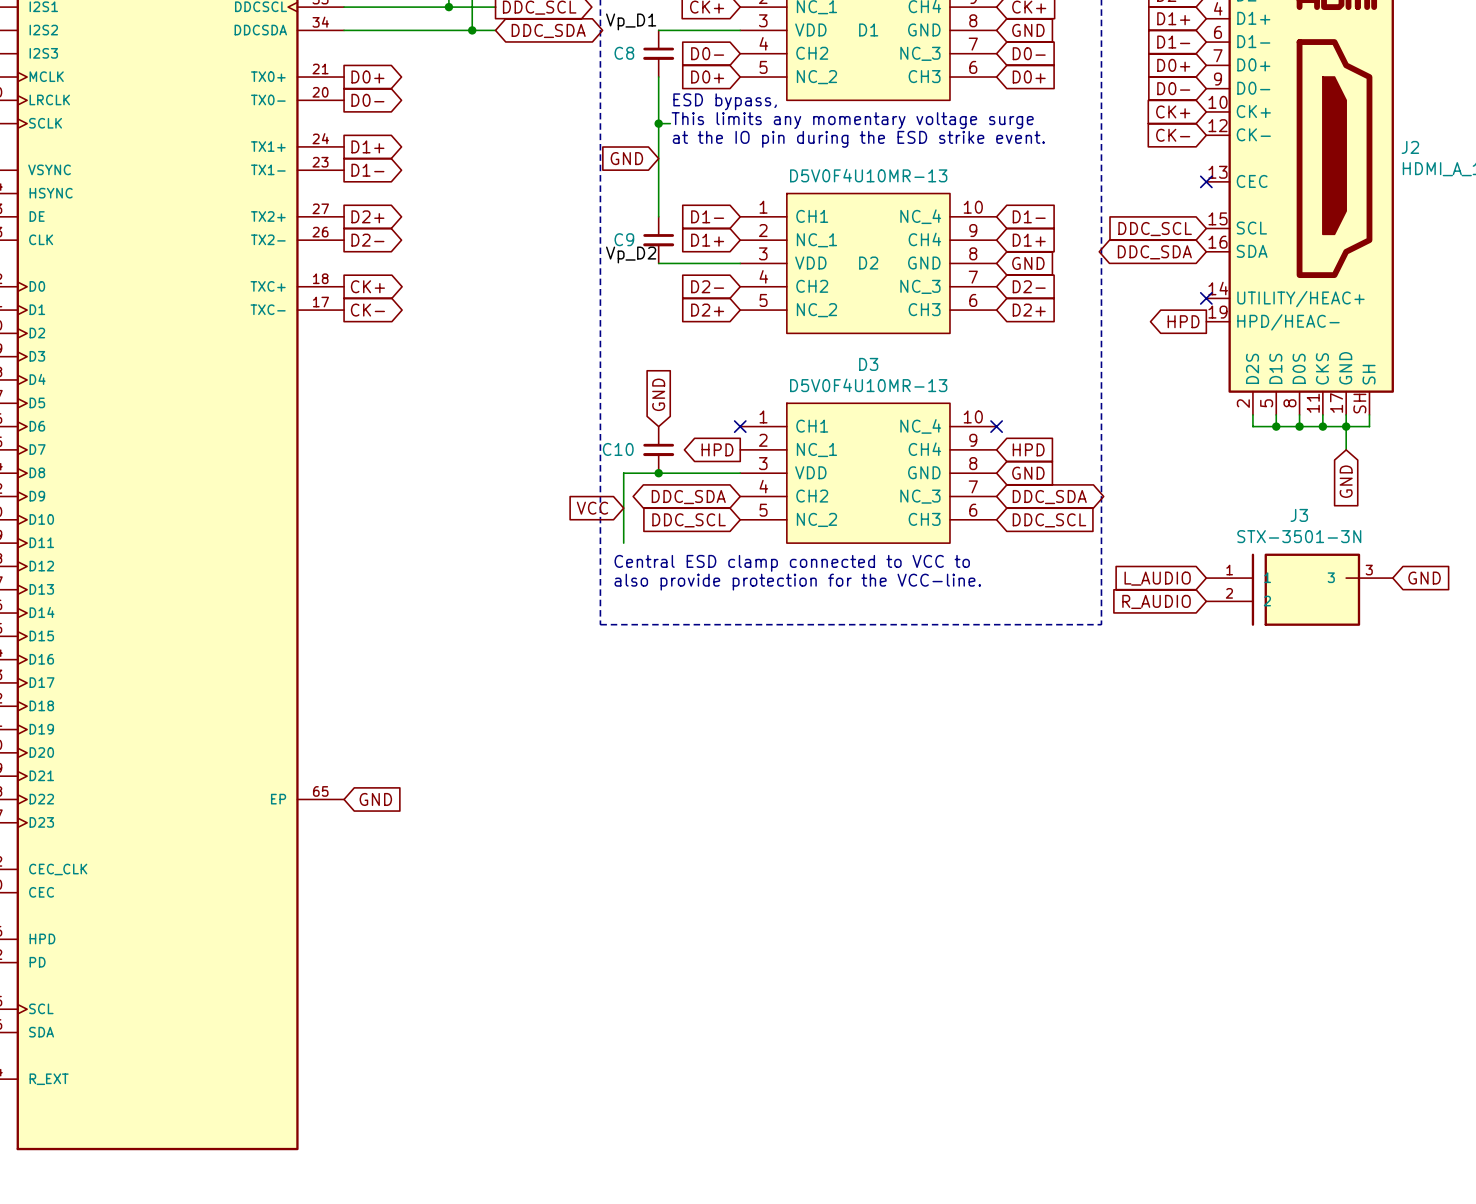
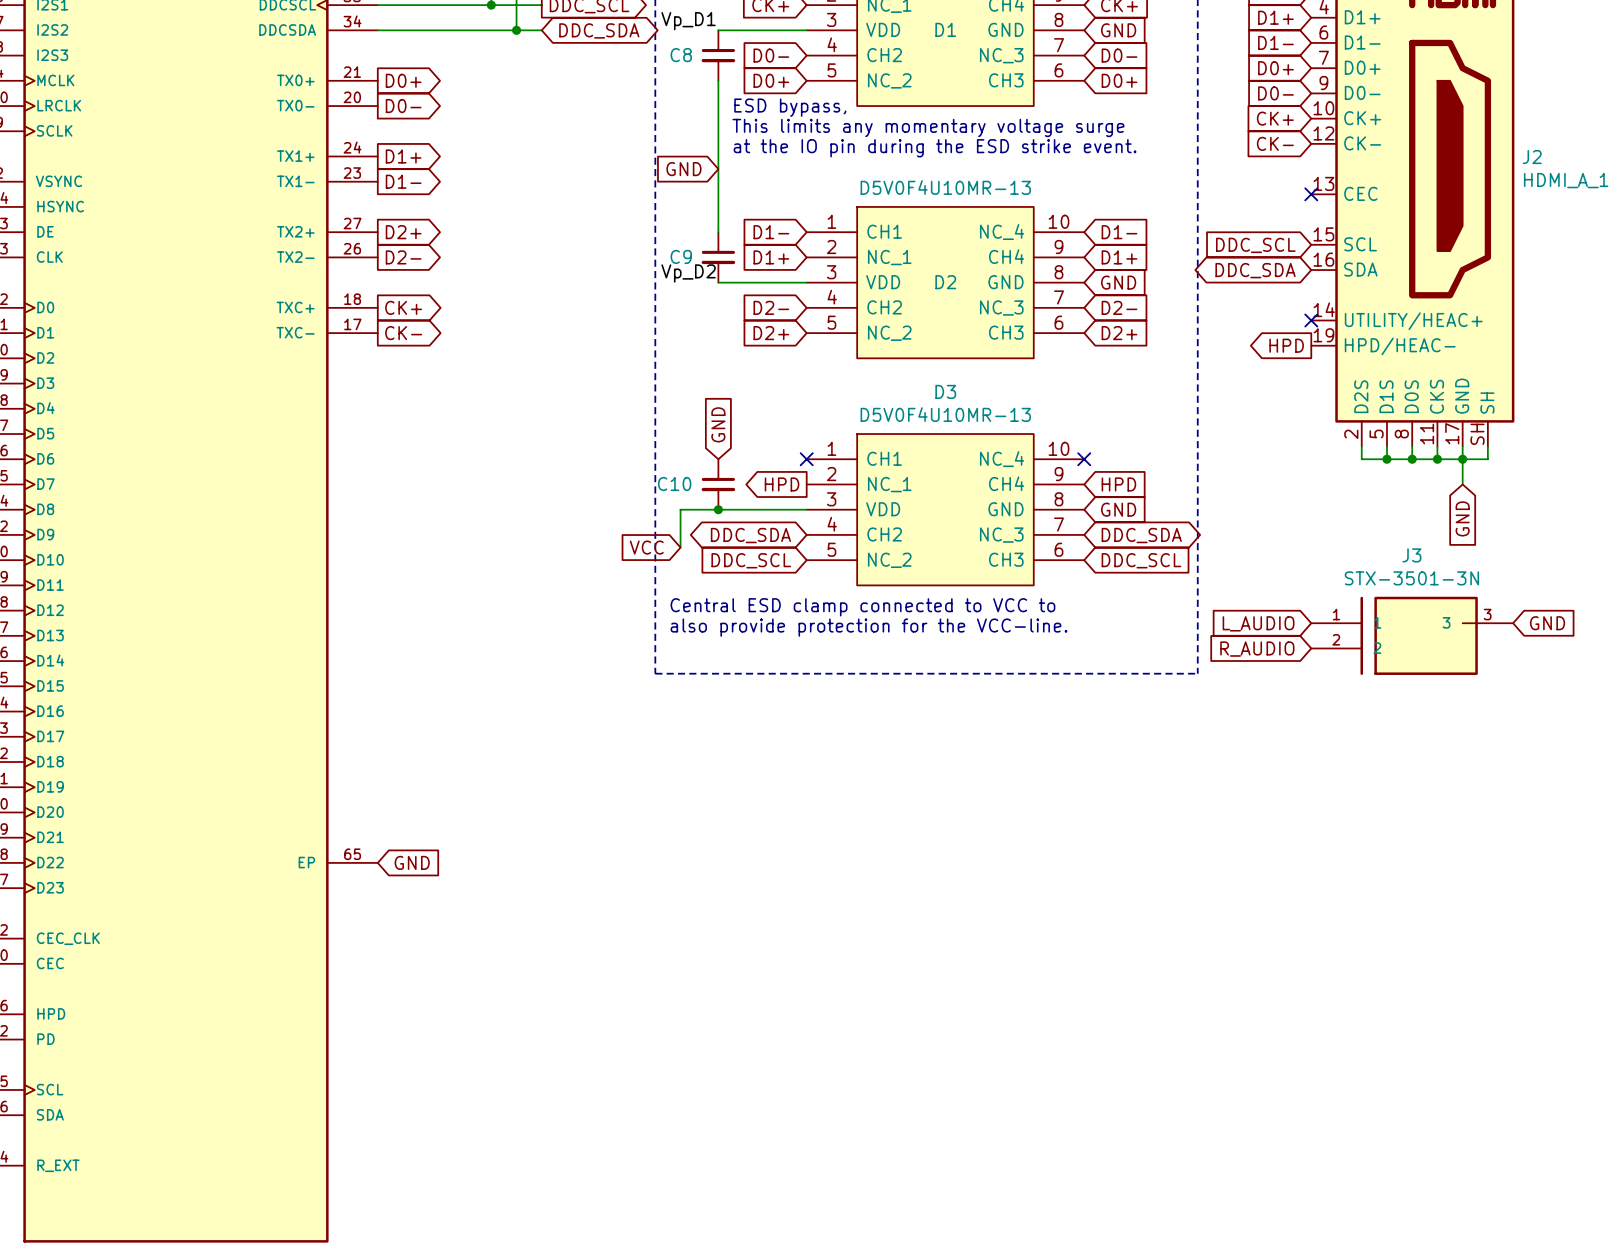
wire: (658, 123) (670, 123) -> none
junction: (658, 123) -> none
wire: (623, 508) (623, 543) -> none

